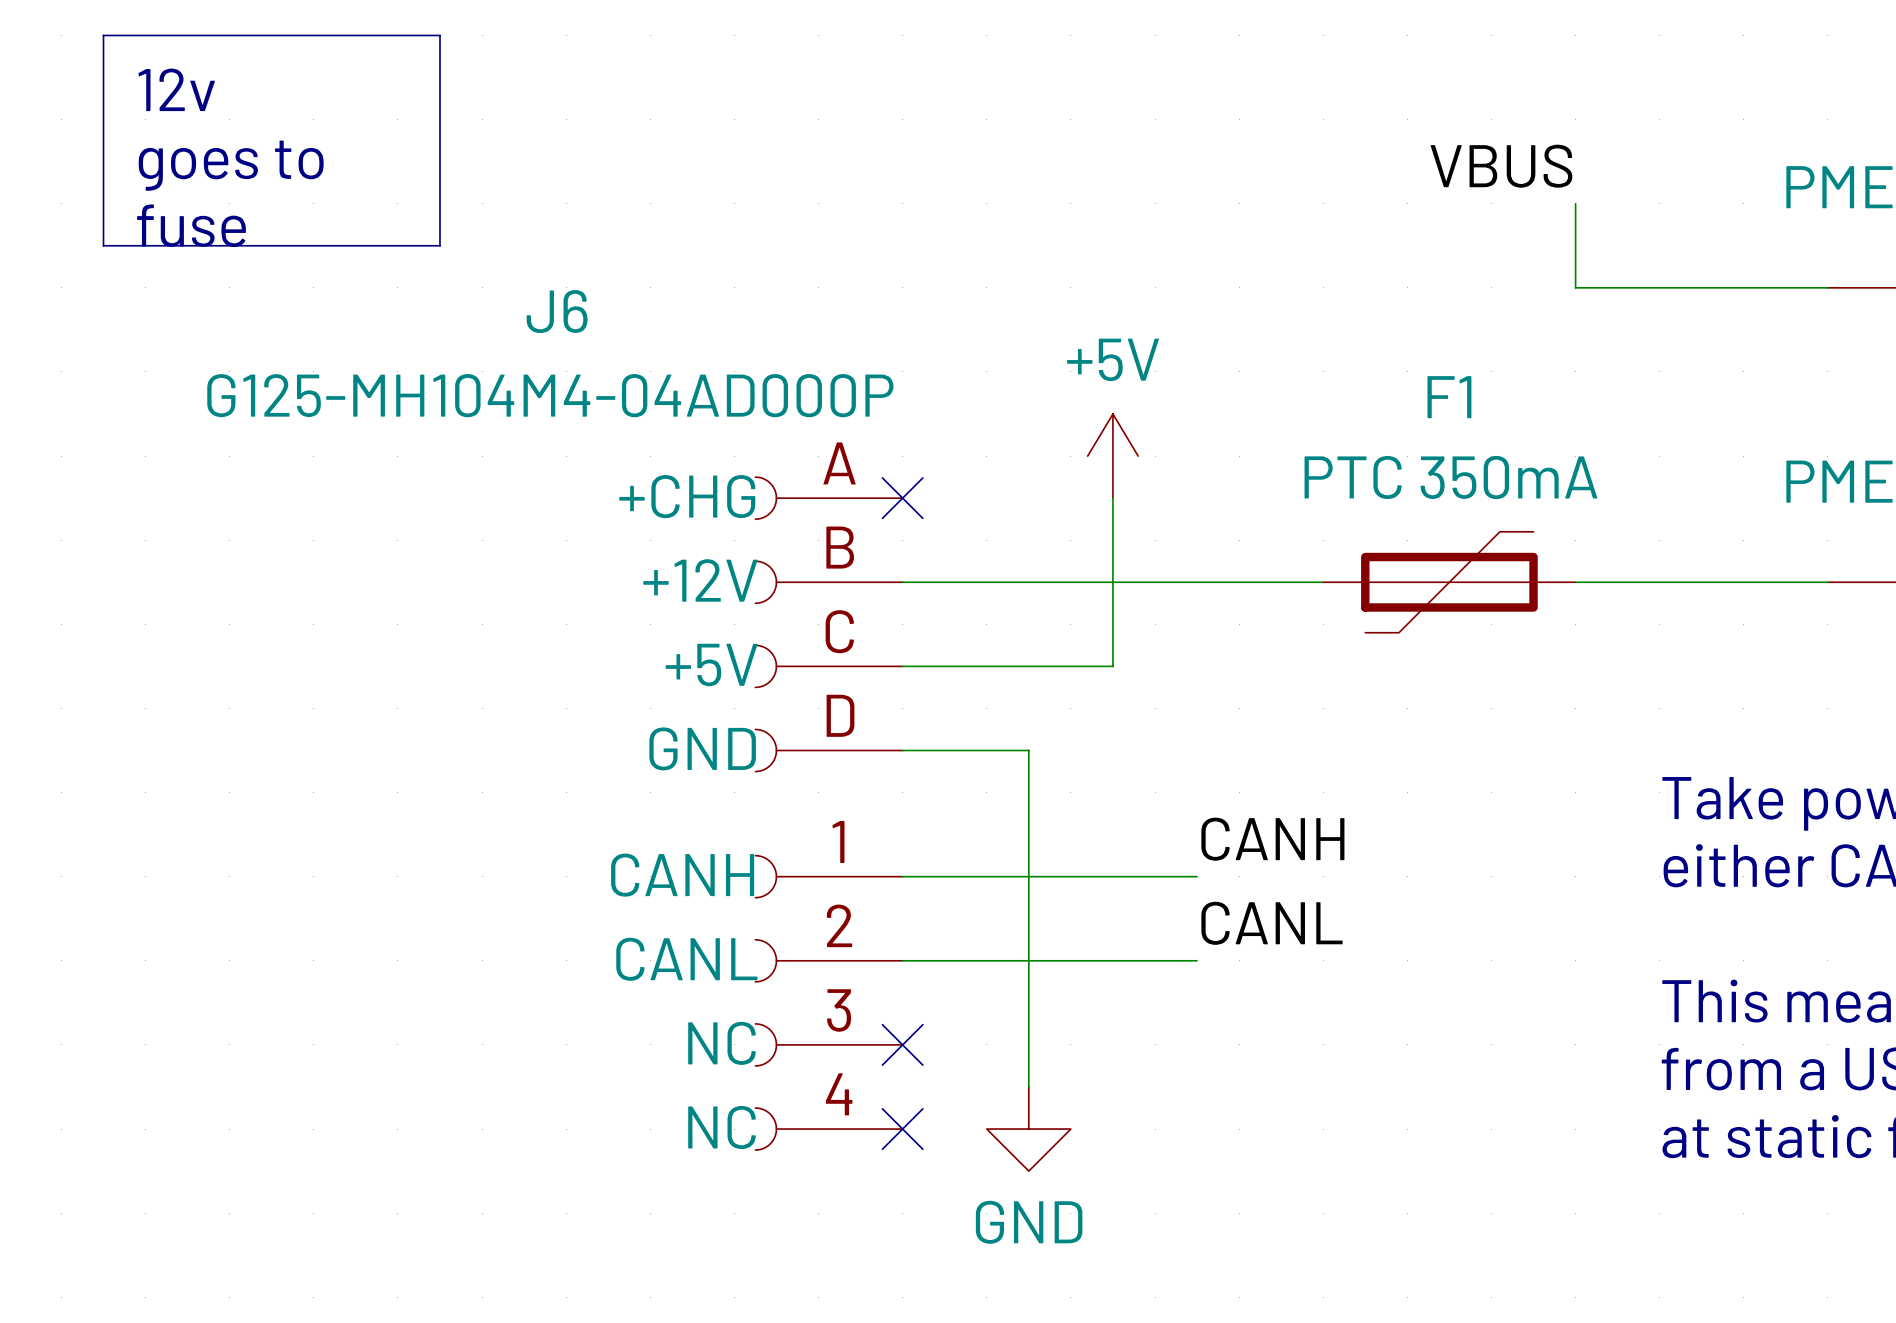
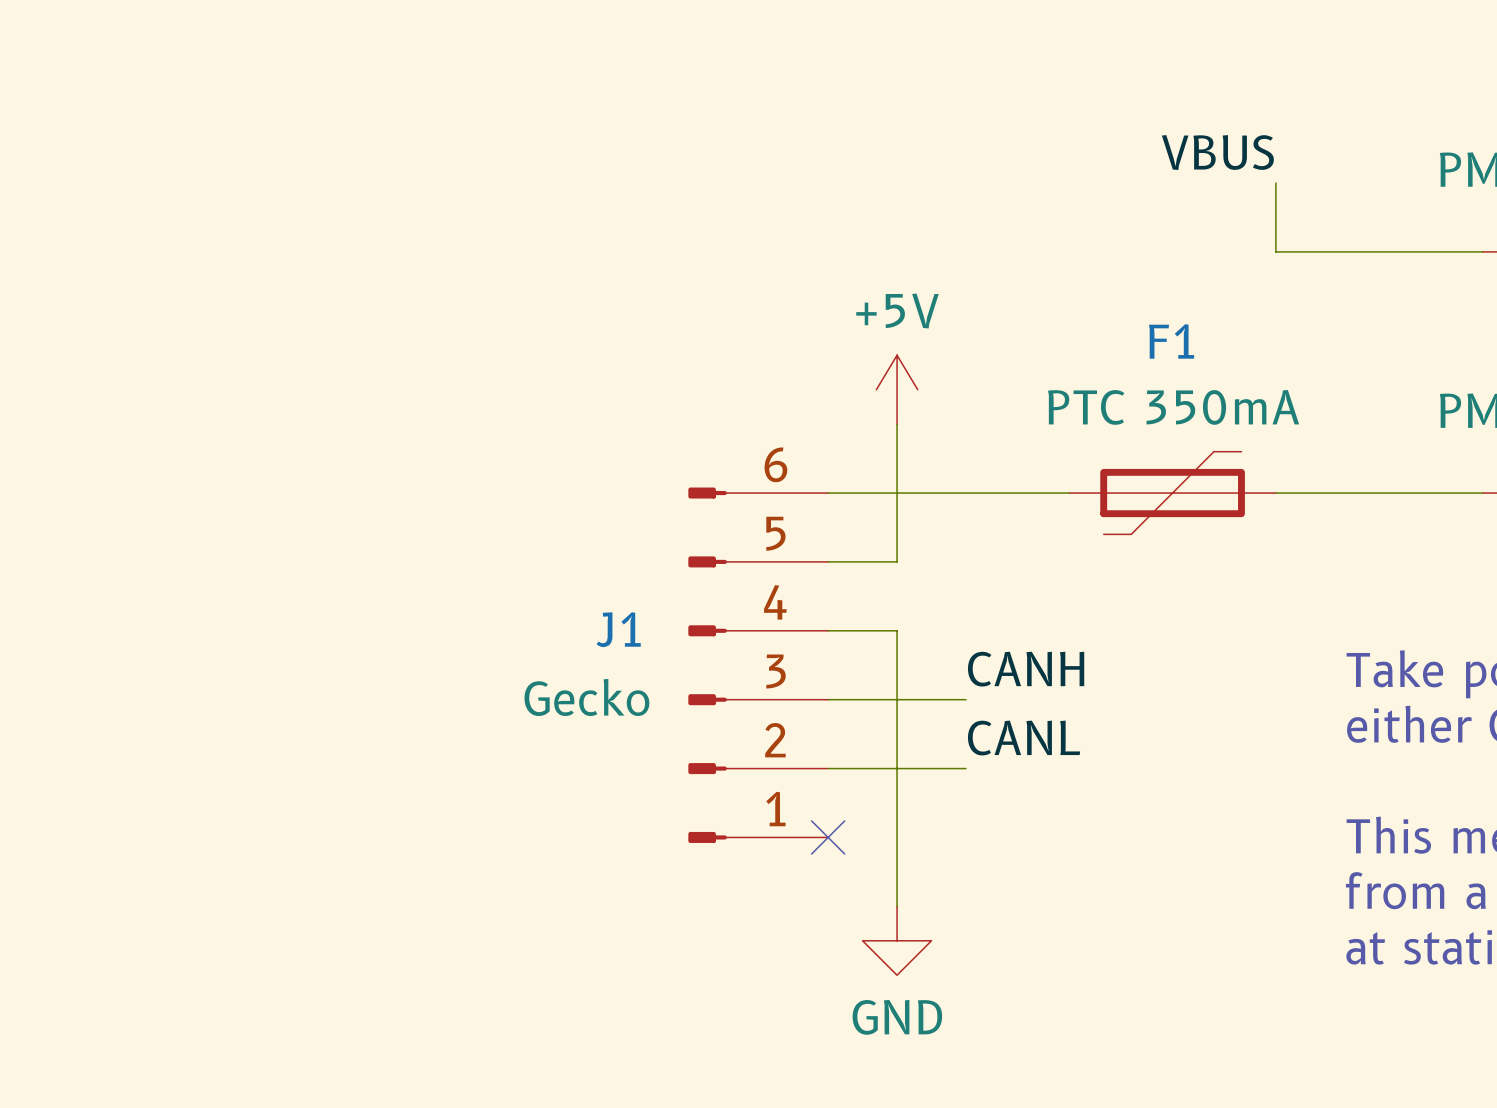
line: (103, 35) (439, 35) (439, 245) (103, 245) (103, 35) -> none
text: 12v (176, 89) -> none
text: goes to (231, 165) -> none
text: fuse (191, 225) -> none
no-connect mark: (902, 498) -> none
wire: (902, 750) (1028, 750) (1028, 1086) -> none
wire: none -> (828, 630) (897, 630) (897, 906)
J1: none -> Gecko (758, 665)
J6: G125-MH104M4-04AD000P (829, 813) -> none
wire: none -> (828, 699) (965, 699)
label position: CANH (1272, 839) -> CANH (1026, 669)
wire: (902, 876) (1197, 876) -> none
wire: none -> (828, 768) (965, 768)
label position: CANL (1271, 923) -> CANL (1024, 738)
wire: (902, 960) (1197, 960) -> none
no-connect mark: none -> (828, 837)
no-connect mark: (902, 1044) -> none
no-connect mark: (902, 1129) -> none
power symbol position: GND (1028, 1129) -> GND (897, 940)

